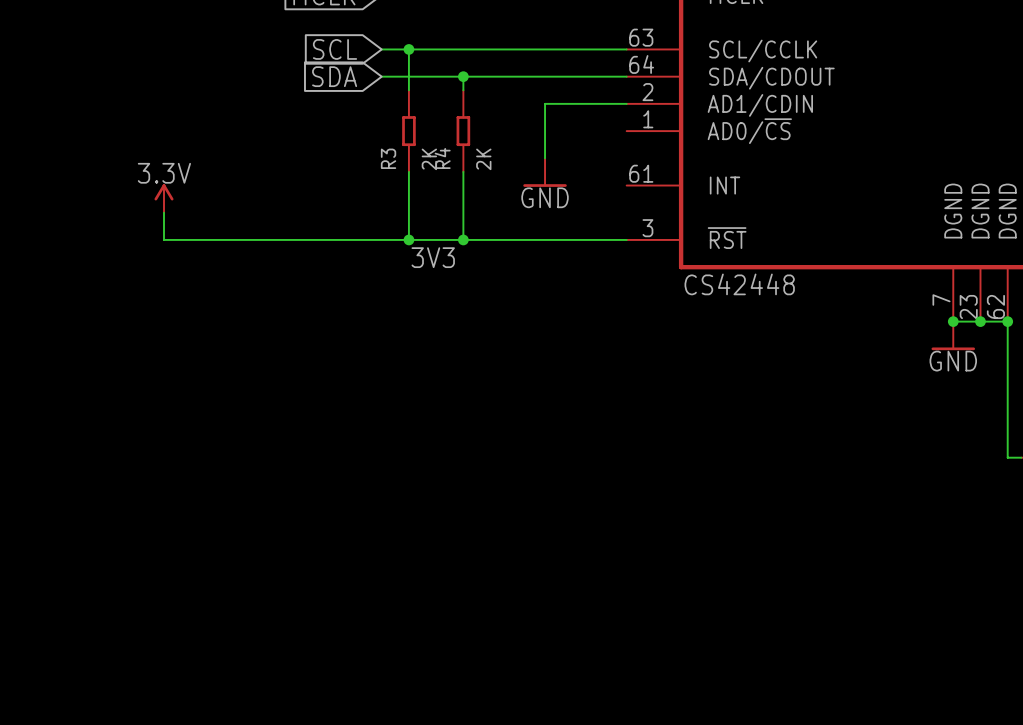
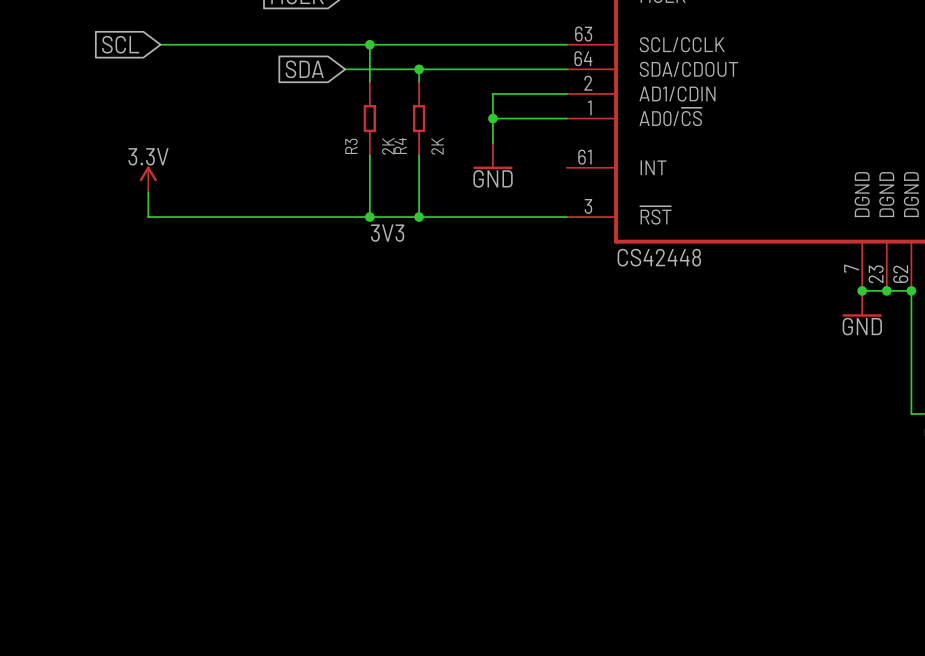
wire: none -> (160, 44) (345, 44)
global label position: SCL (335, 49) -> SCL (120, 44)
wire: none -> (492, 118) (566, 118)
junction: none -> (492, 118)

